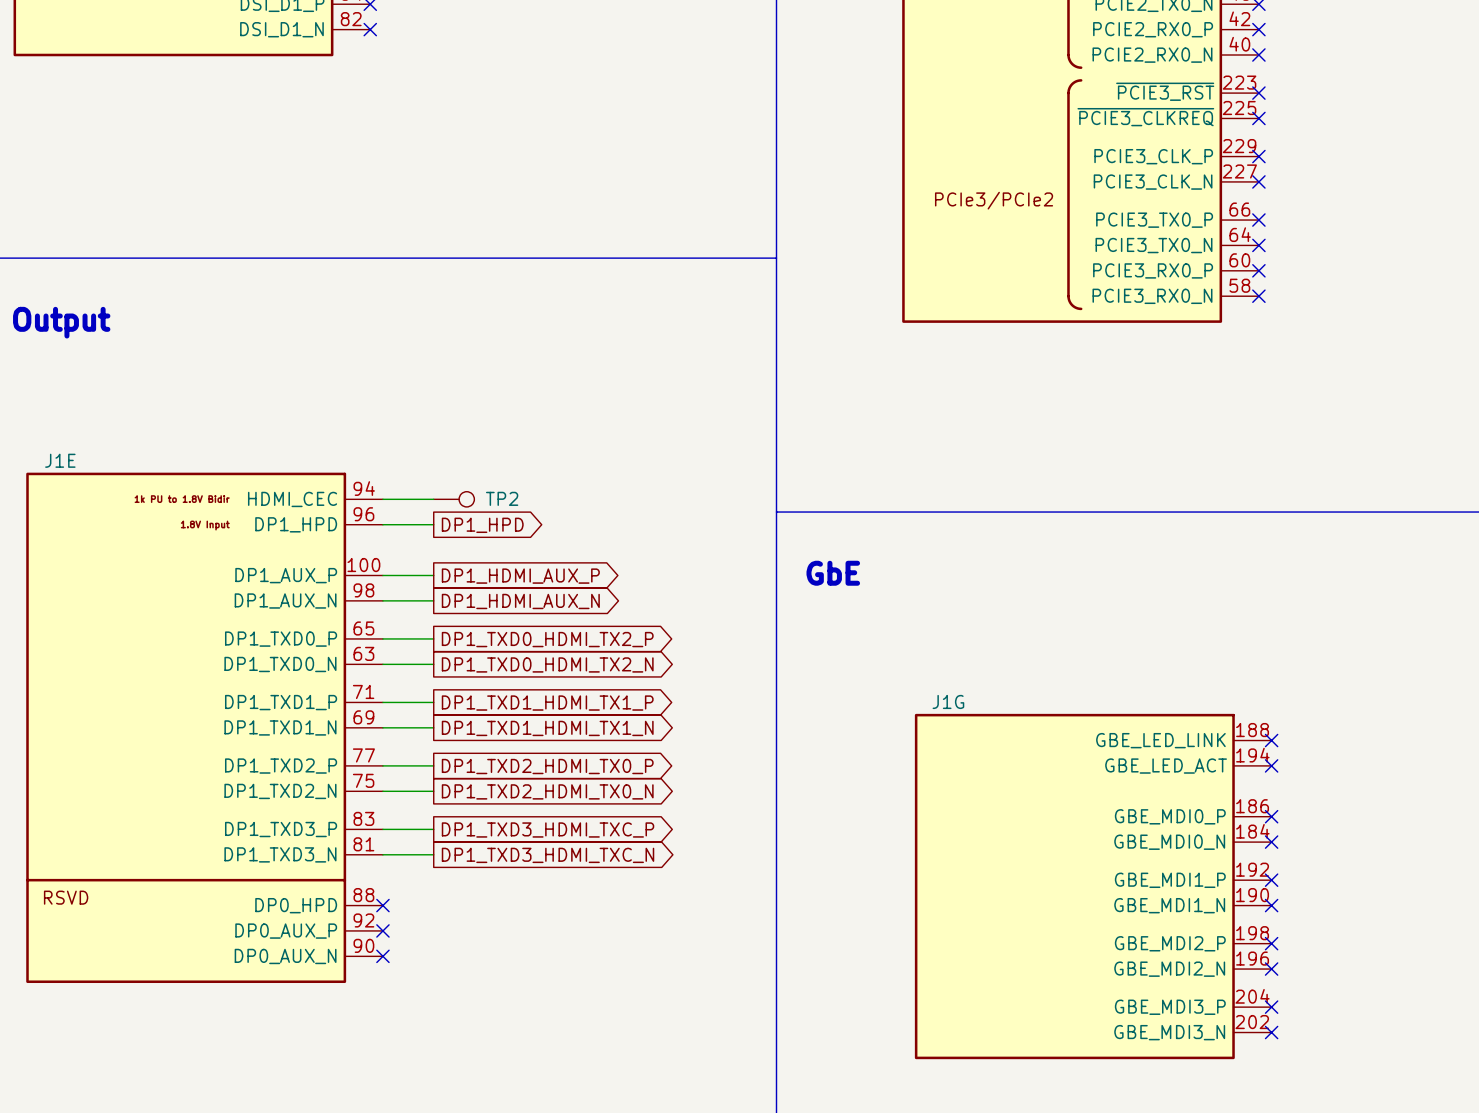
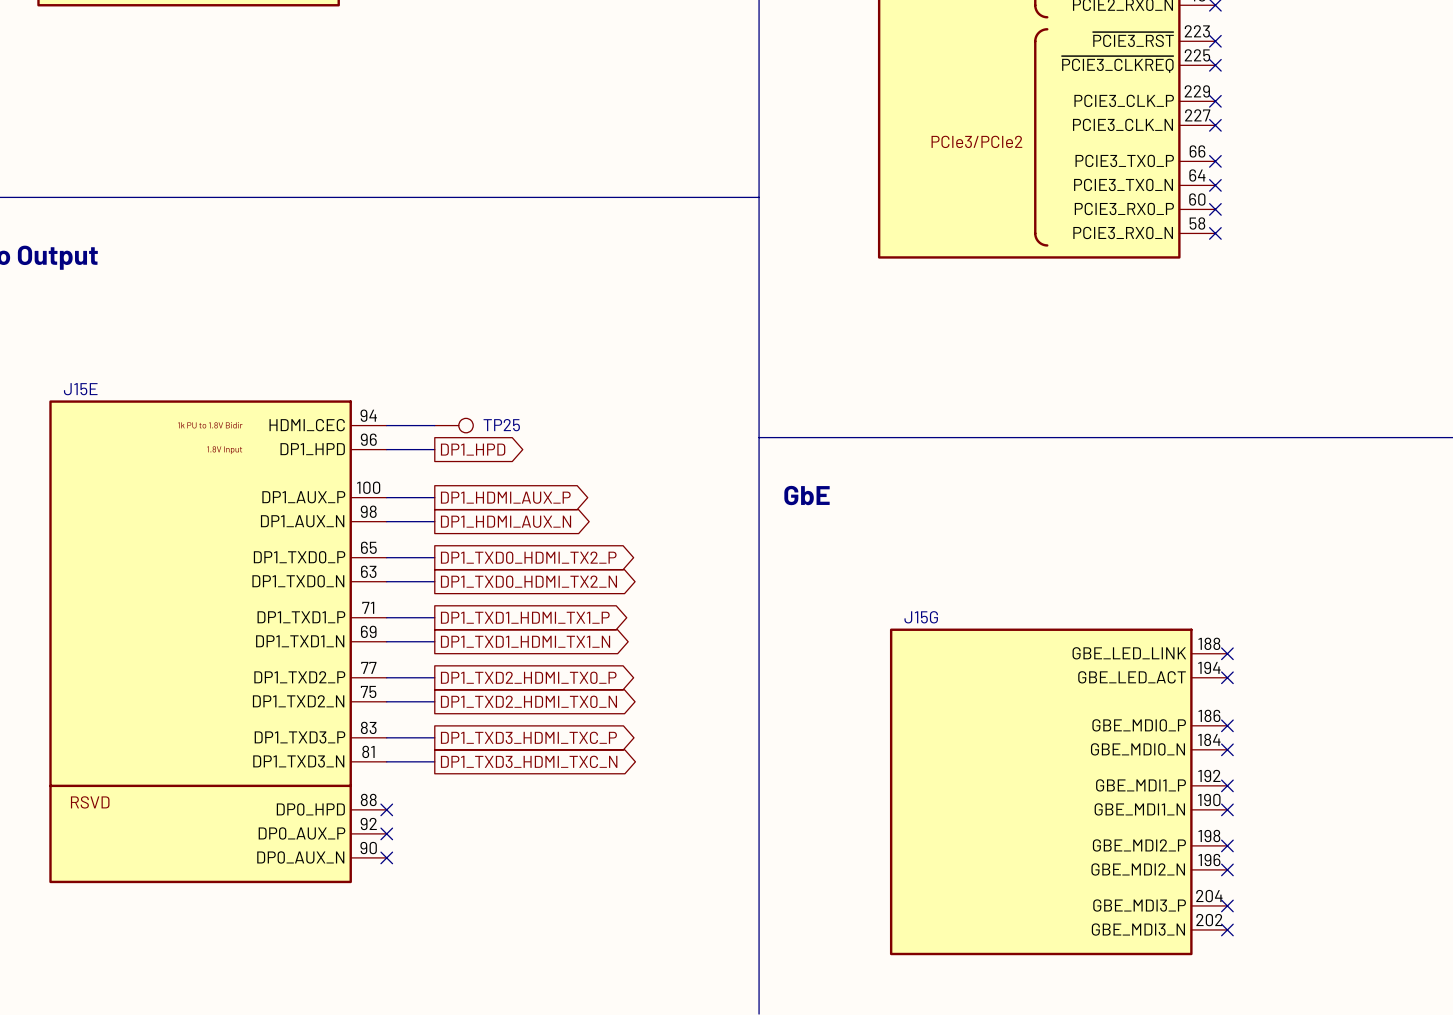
J1E name: J1E (60, 460) -> J15E (80, 389)
TP2 name: TP2 (502, 498) -> TP25 (501, 425)
J1G name: J1G (948, 701) -> J15G (921, 617)

